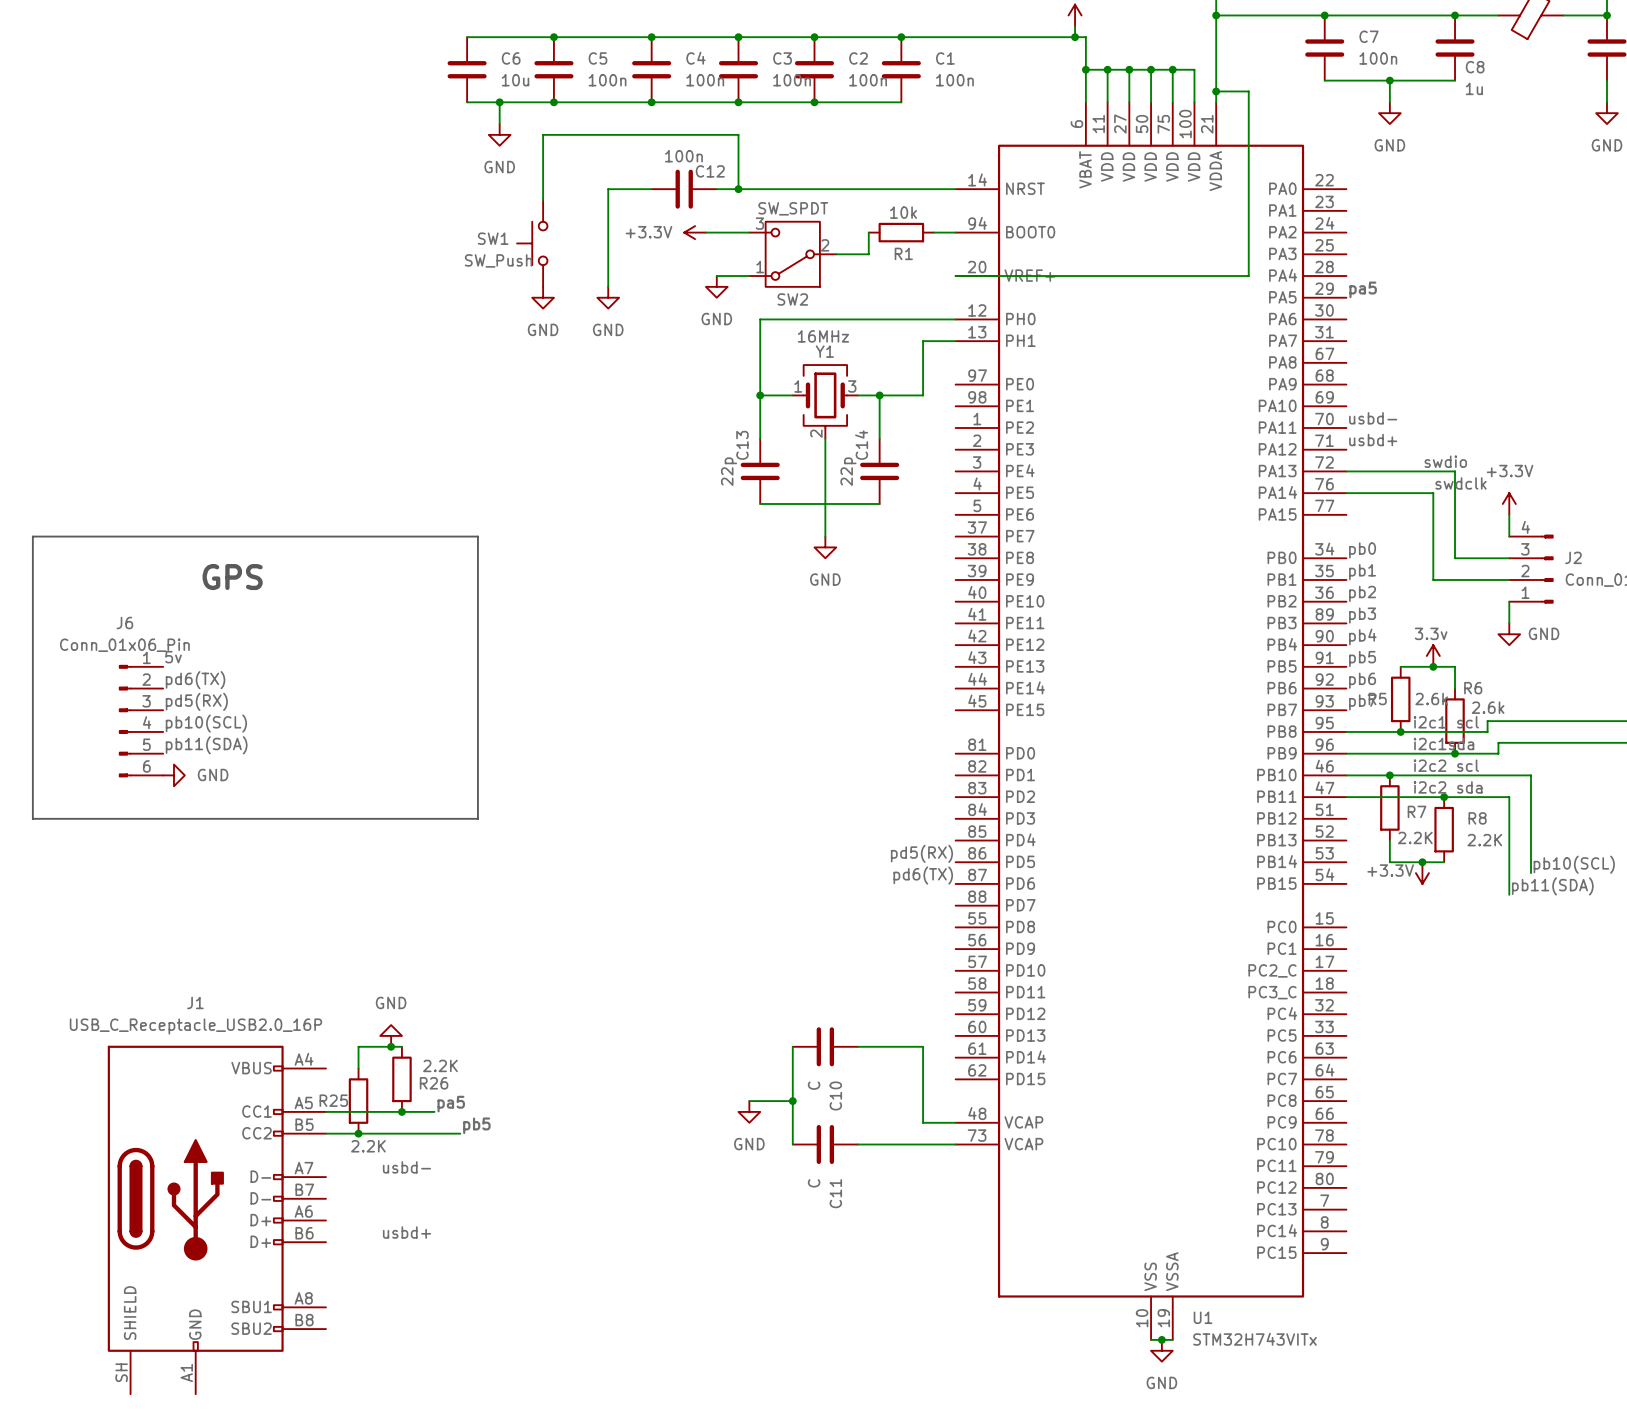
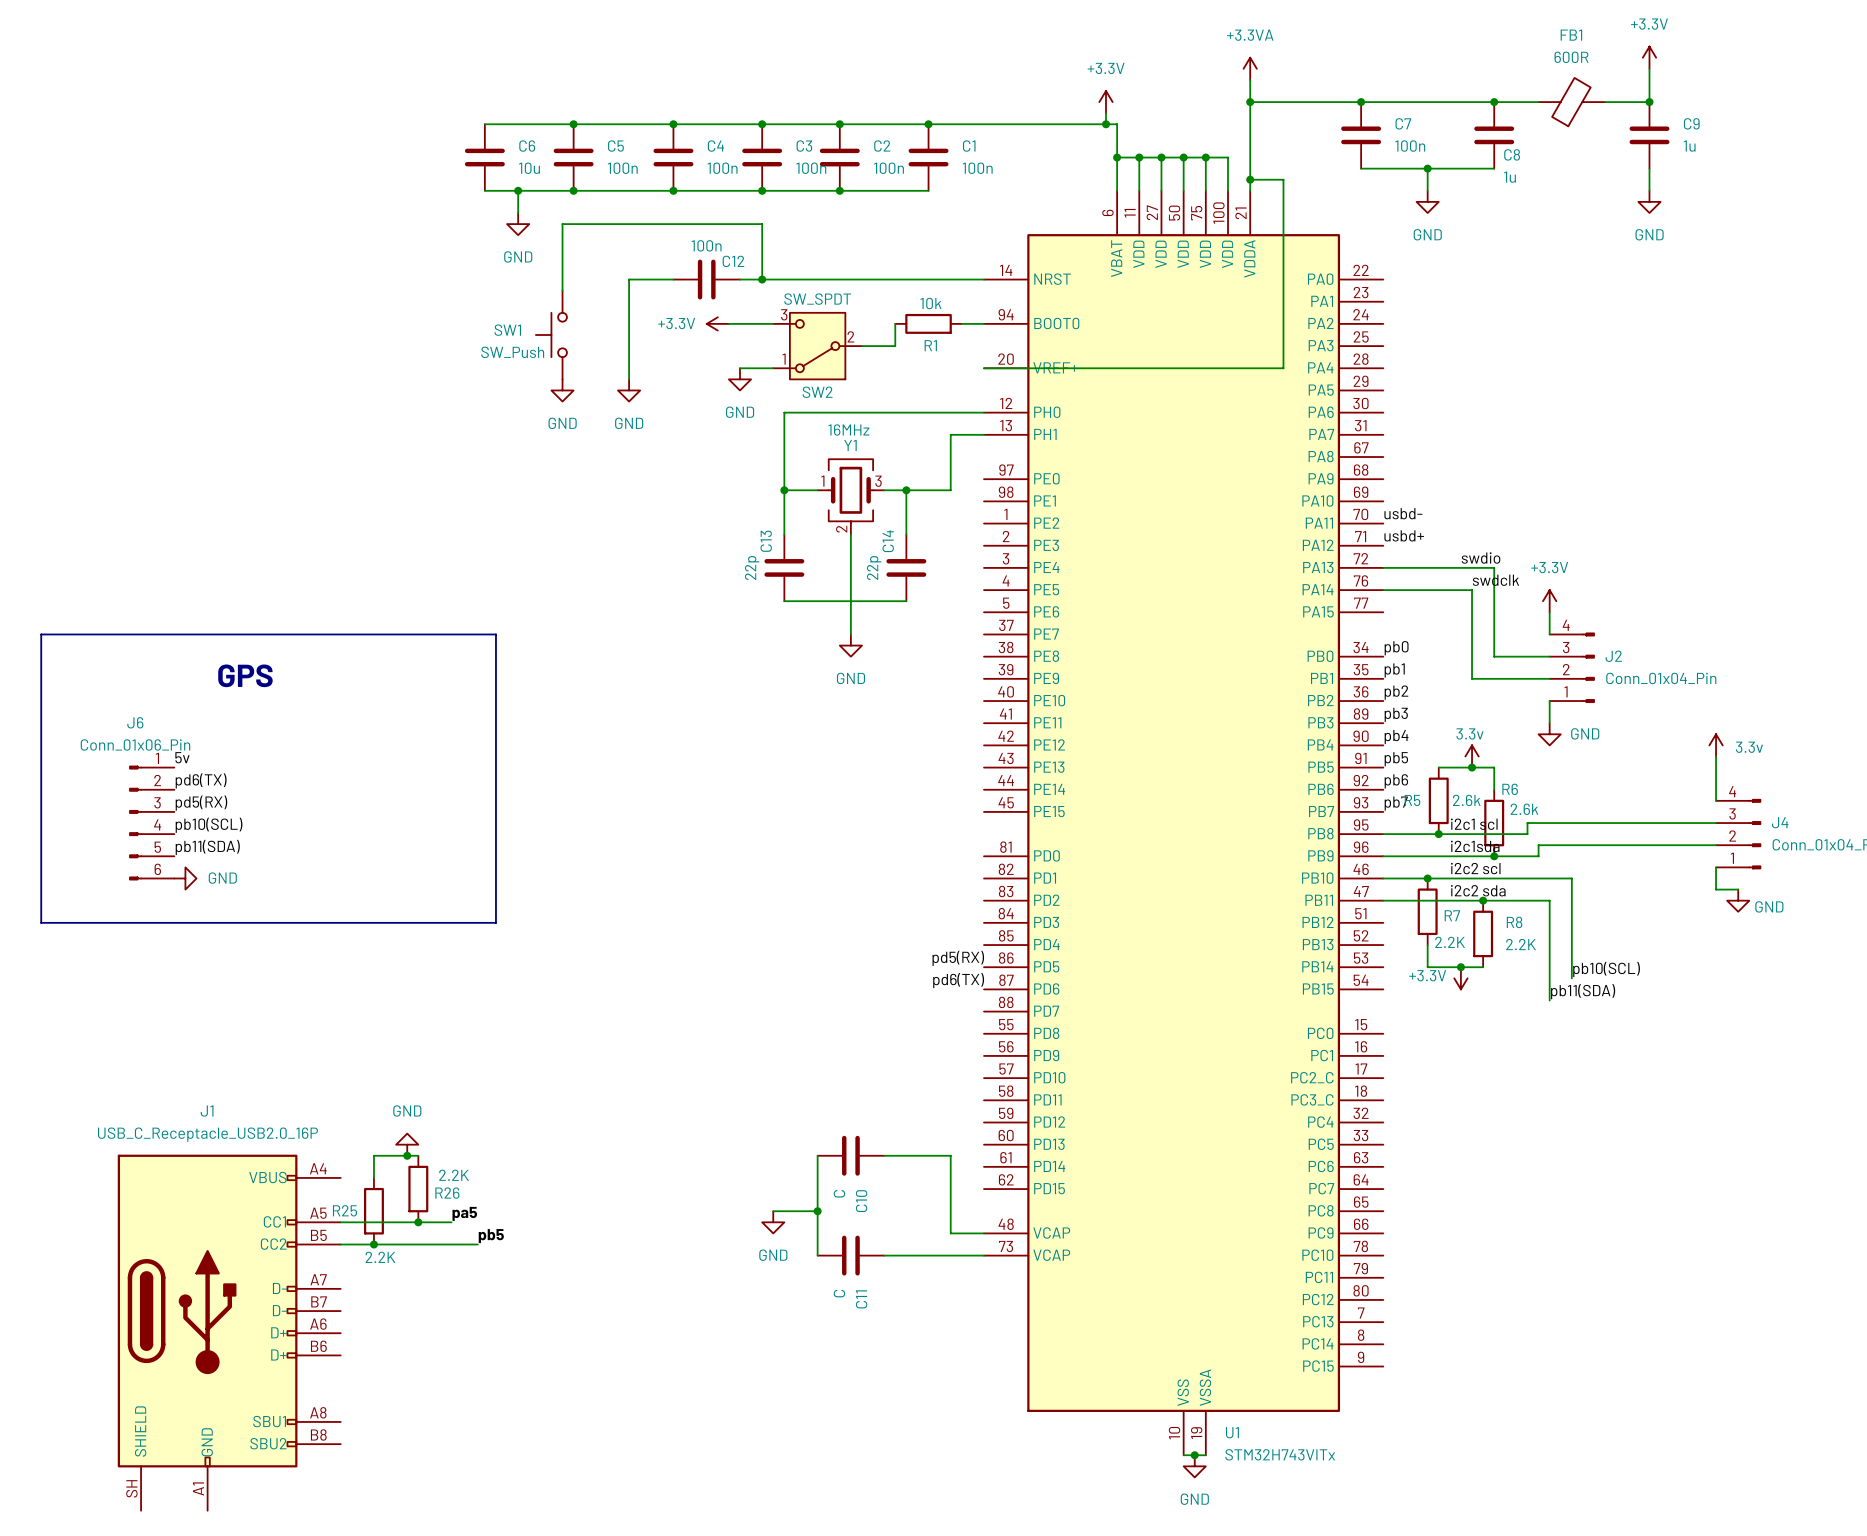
label: pa5 (1363, 289) -> none
label: usbd- (406, 1167) -> none
label: usbd+ (406, 1232) -> none

